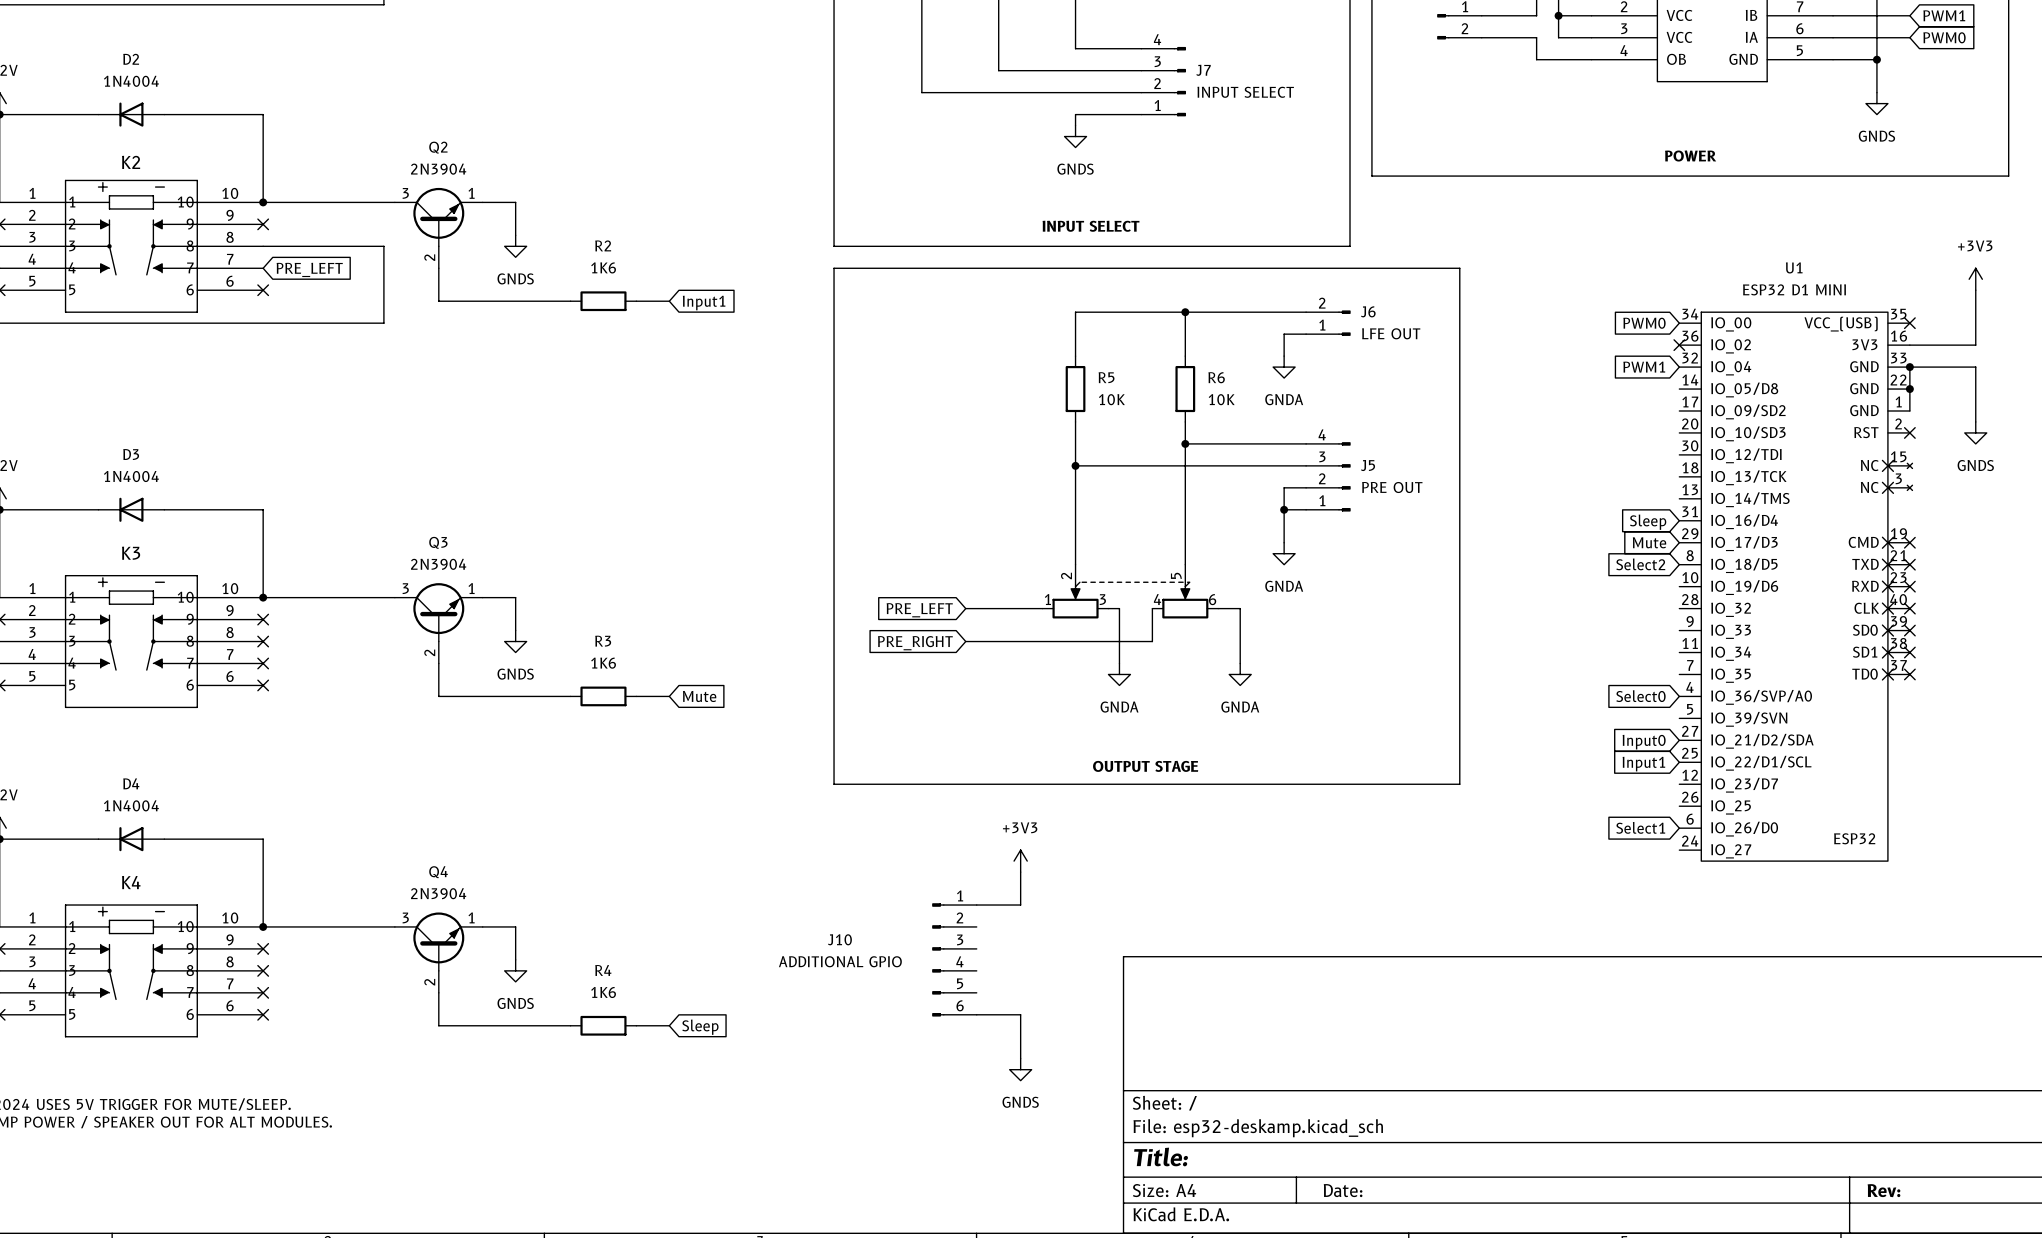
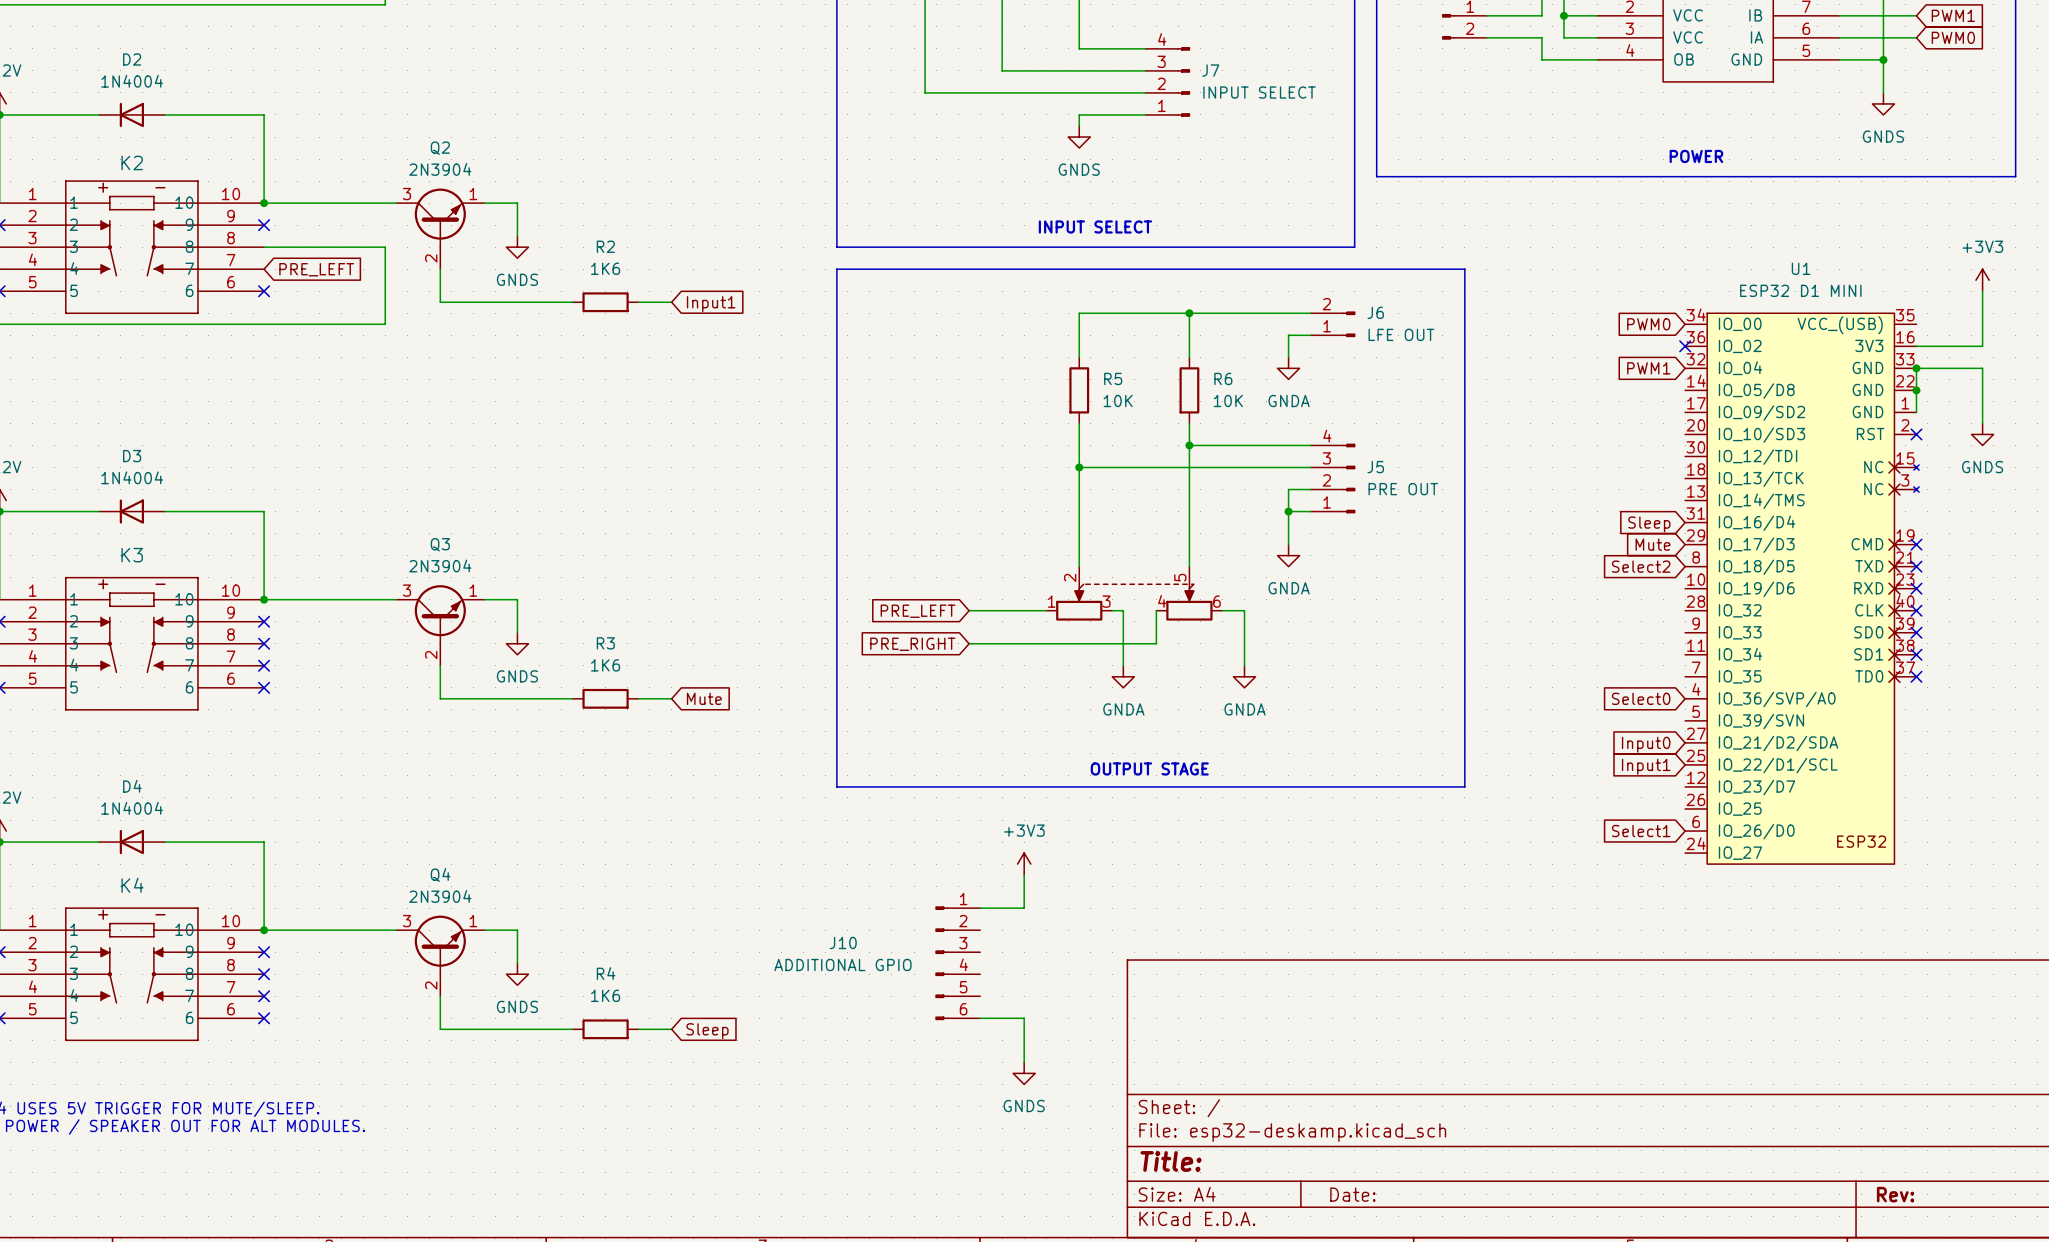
no-connect mark: (1909, 323) -> none

